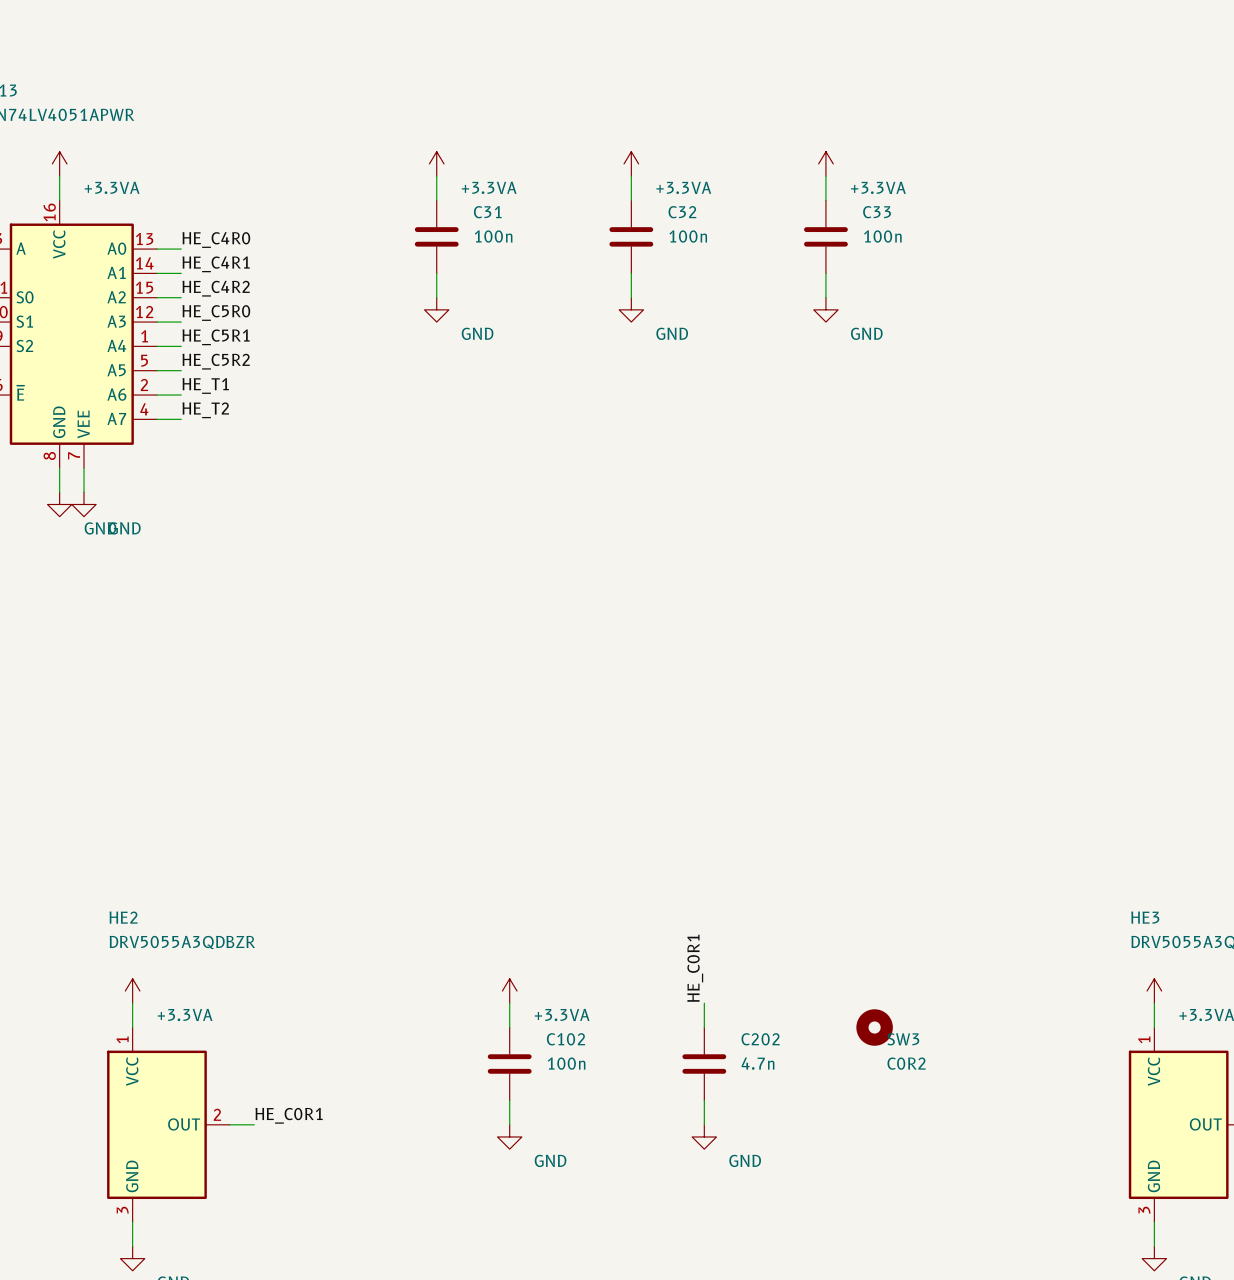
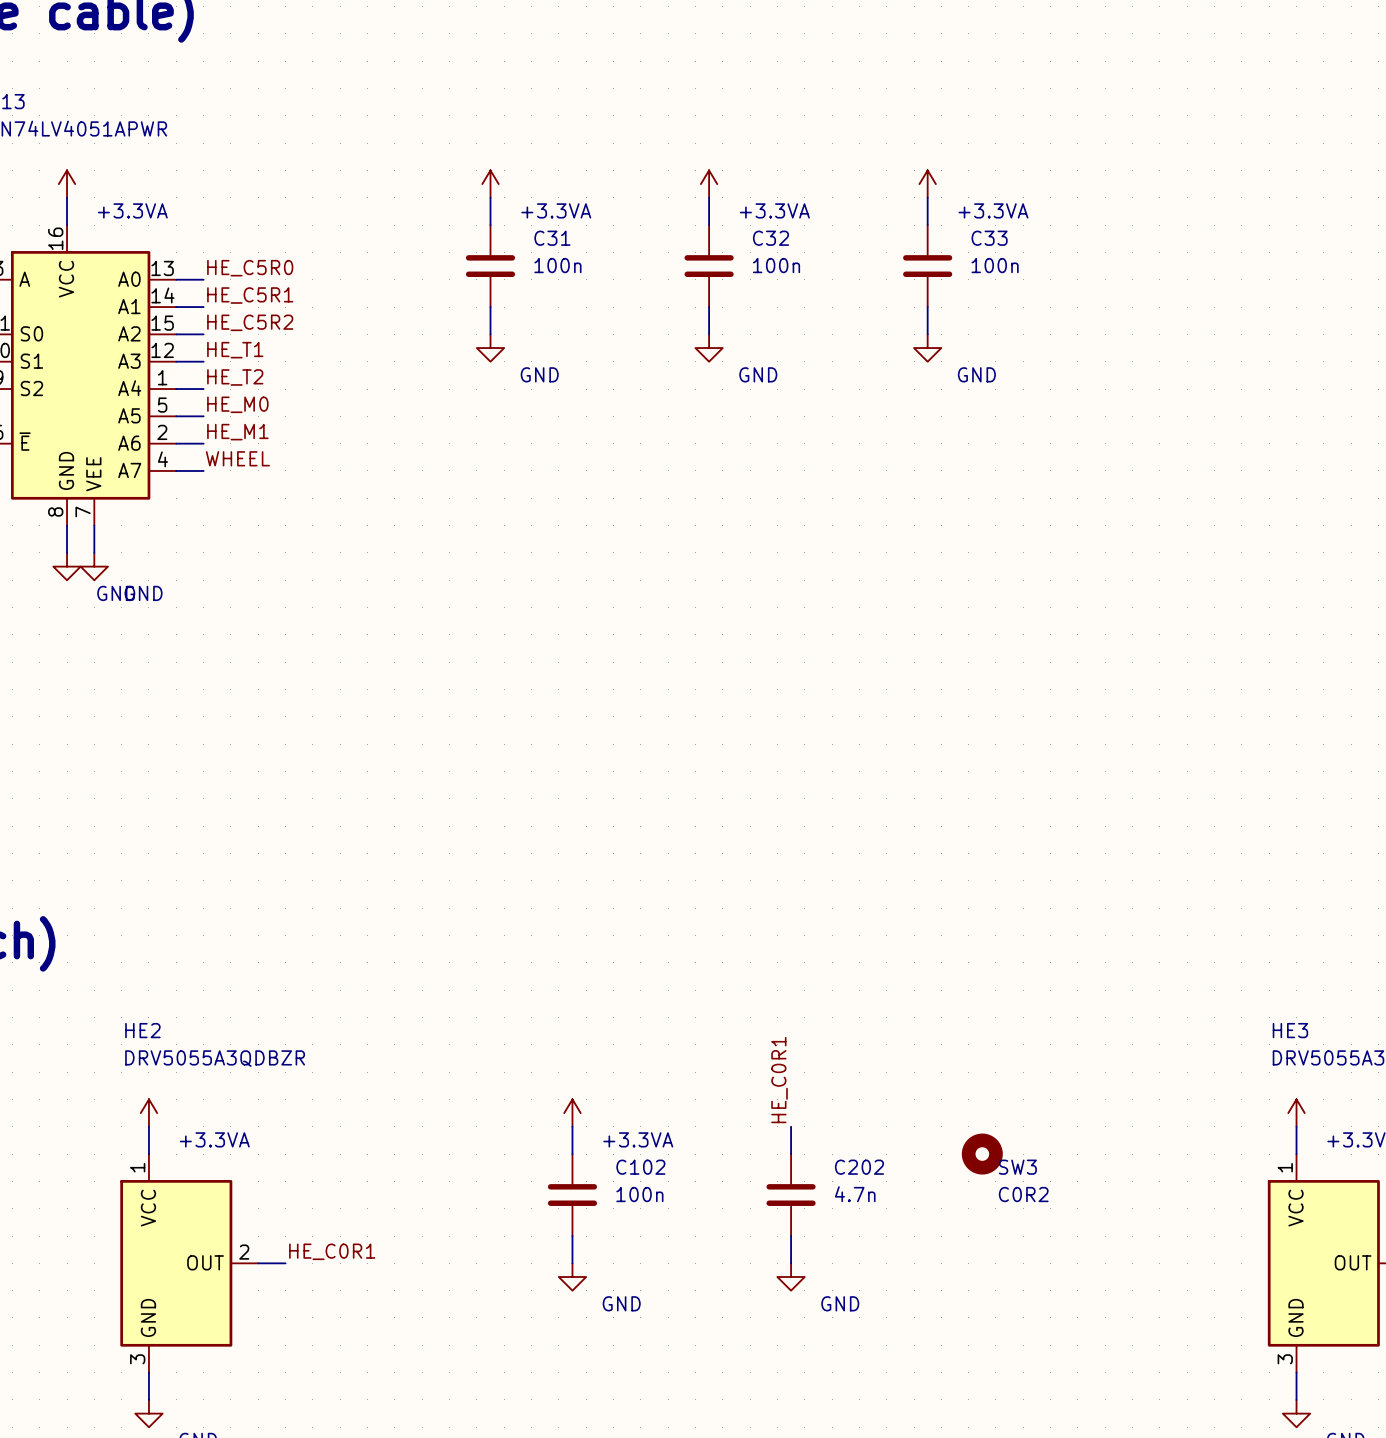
label: HE_C4R0 (216, 240) -> HE_C5R0 (250, 268)
label: HE_C4R1 (216, 264) -> HE_C5R1 (250, 295)
label: HE_C4R2 (216, 288) -> HE_C5R2 (250, 322)
label: HE_C5R0 (216, 313) -> HE_T1 (235, 350)
label: HE_C5R1 (216, 337) -> HE_T2 (235, 377)
label: HE_C5R2 (216, 361) -> HE_M0 (237, 404)
label: HE_T1 (205, 385) -> HE_M1 (237, 432)
label: HE_T2 (205, 410) -> WHEEL (237, 458)

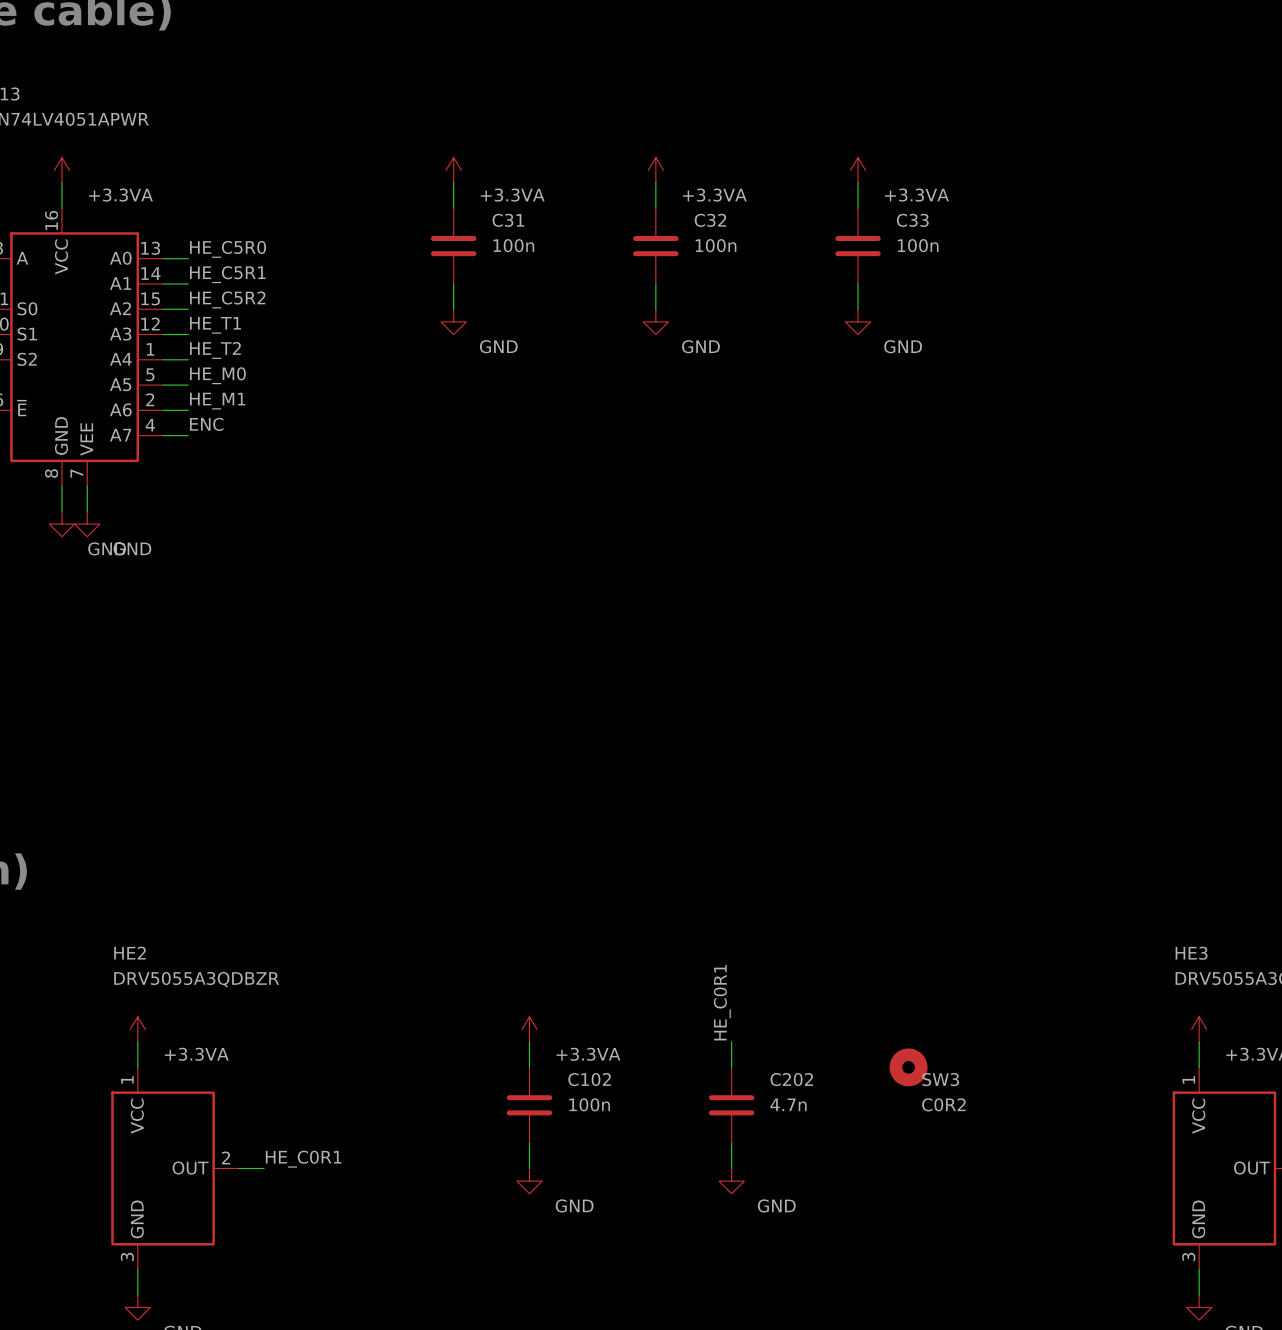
label: WHEEL (237, 458) -> ENC (206, 424)

